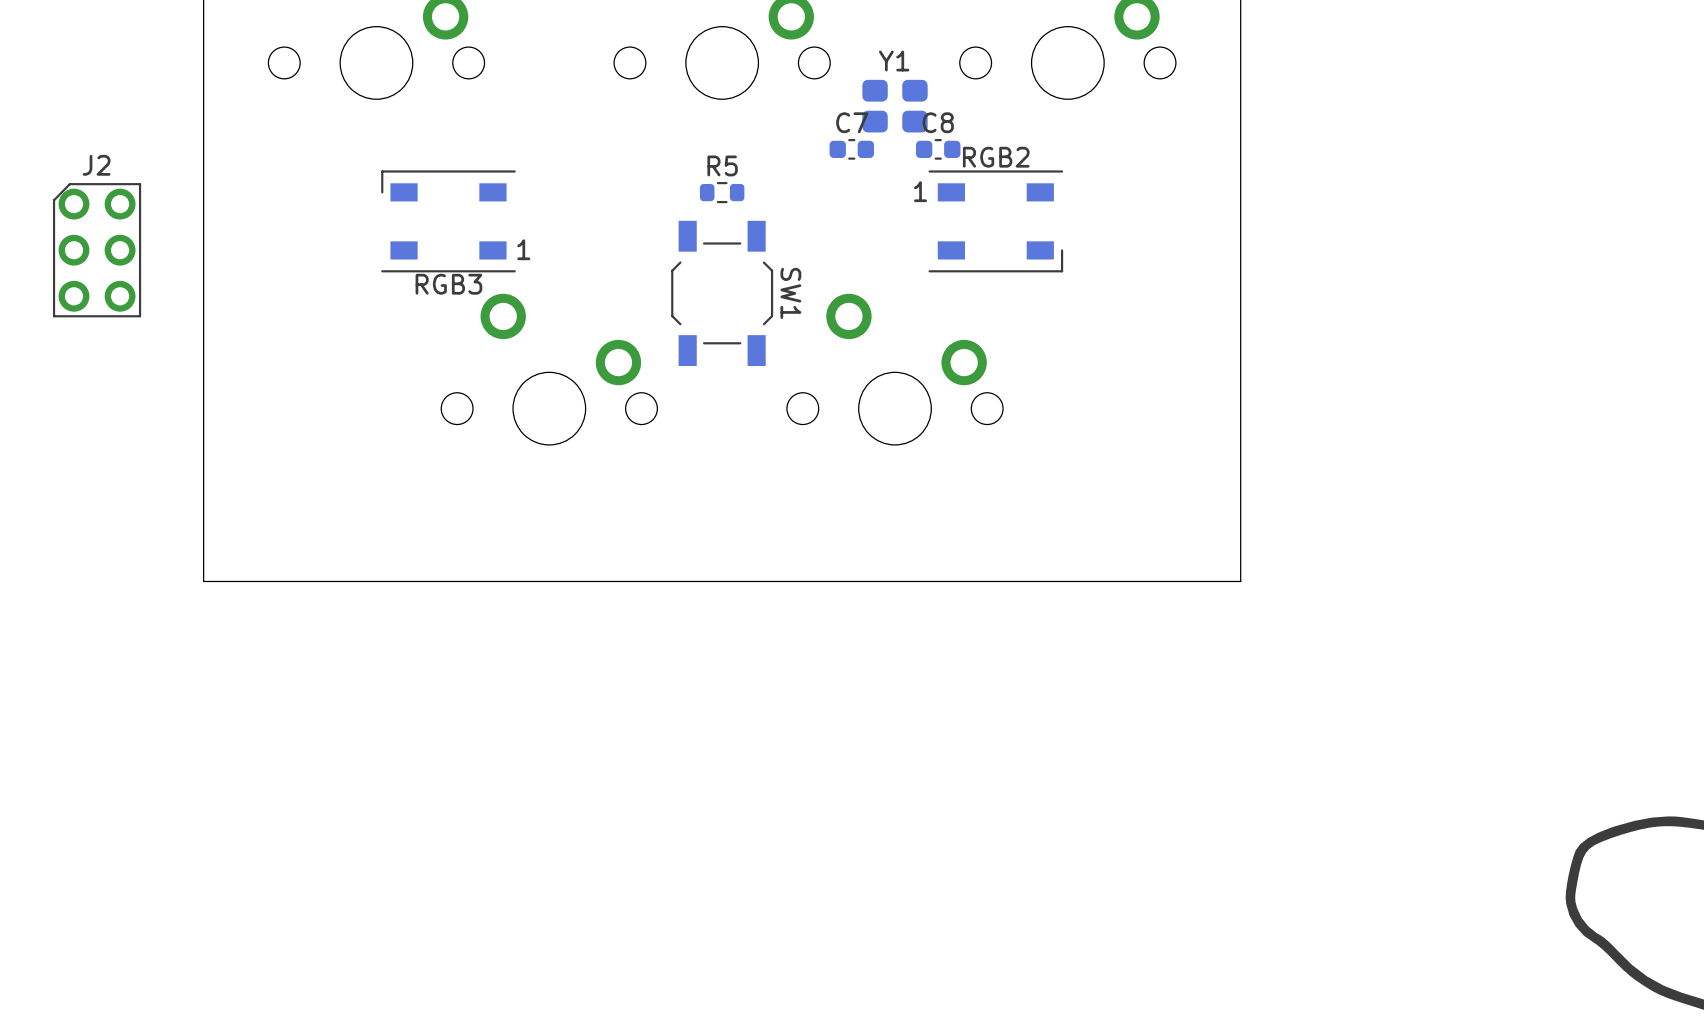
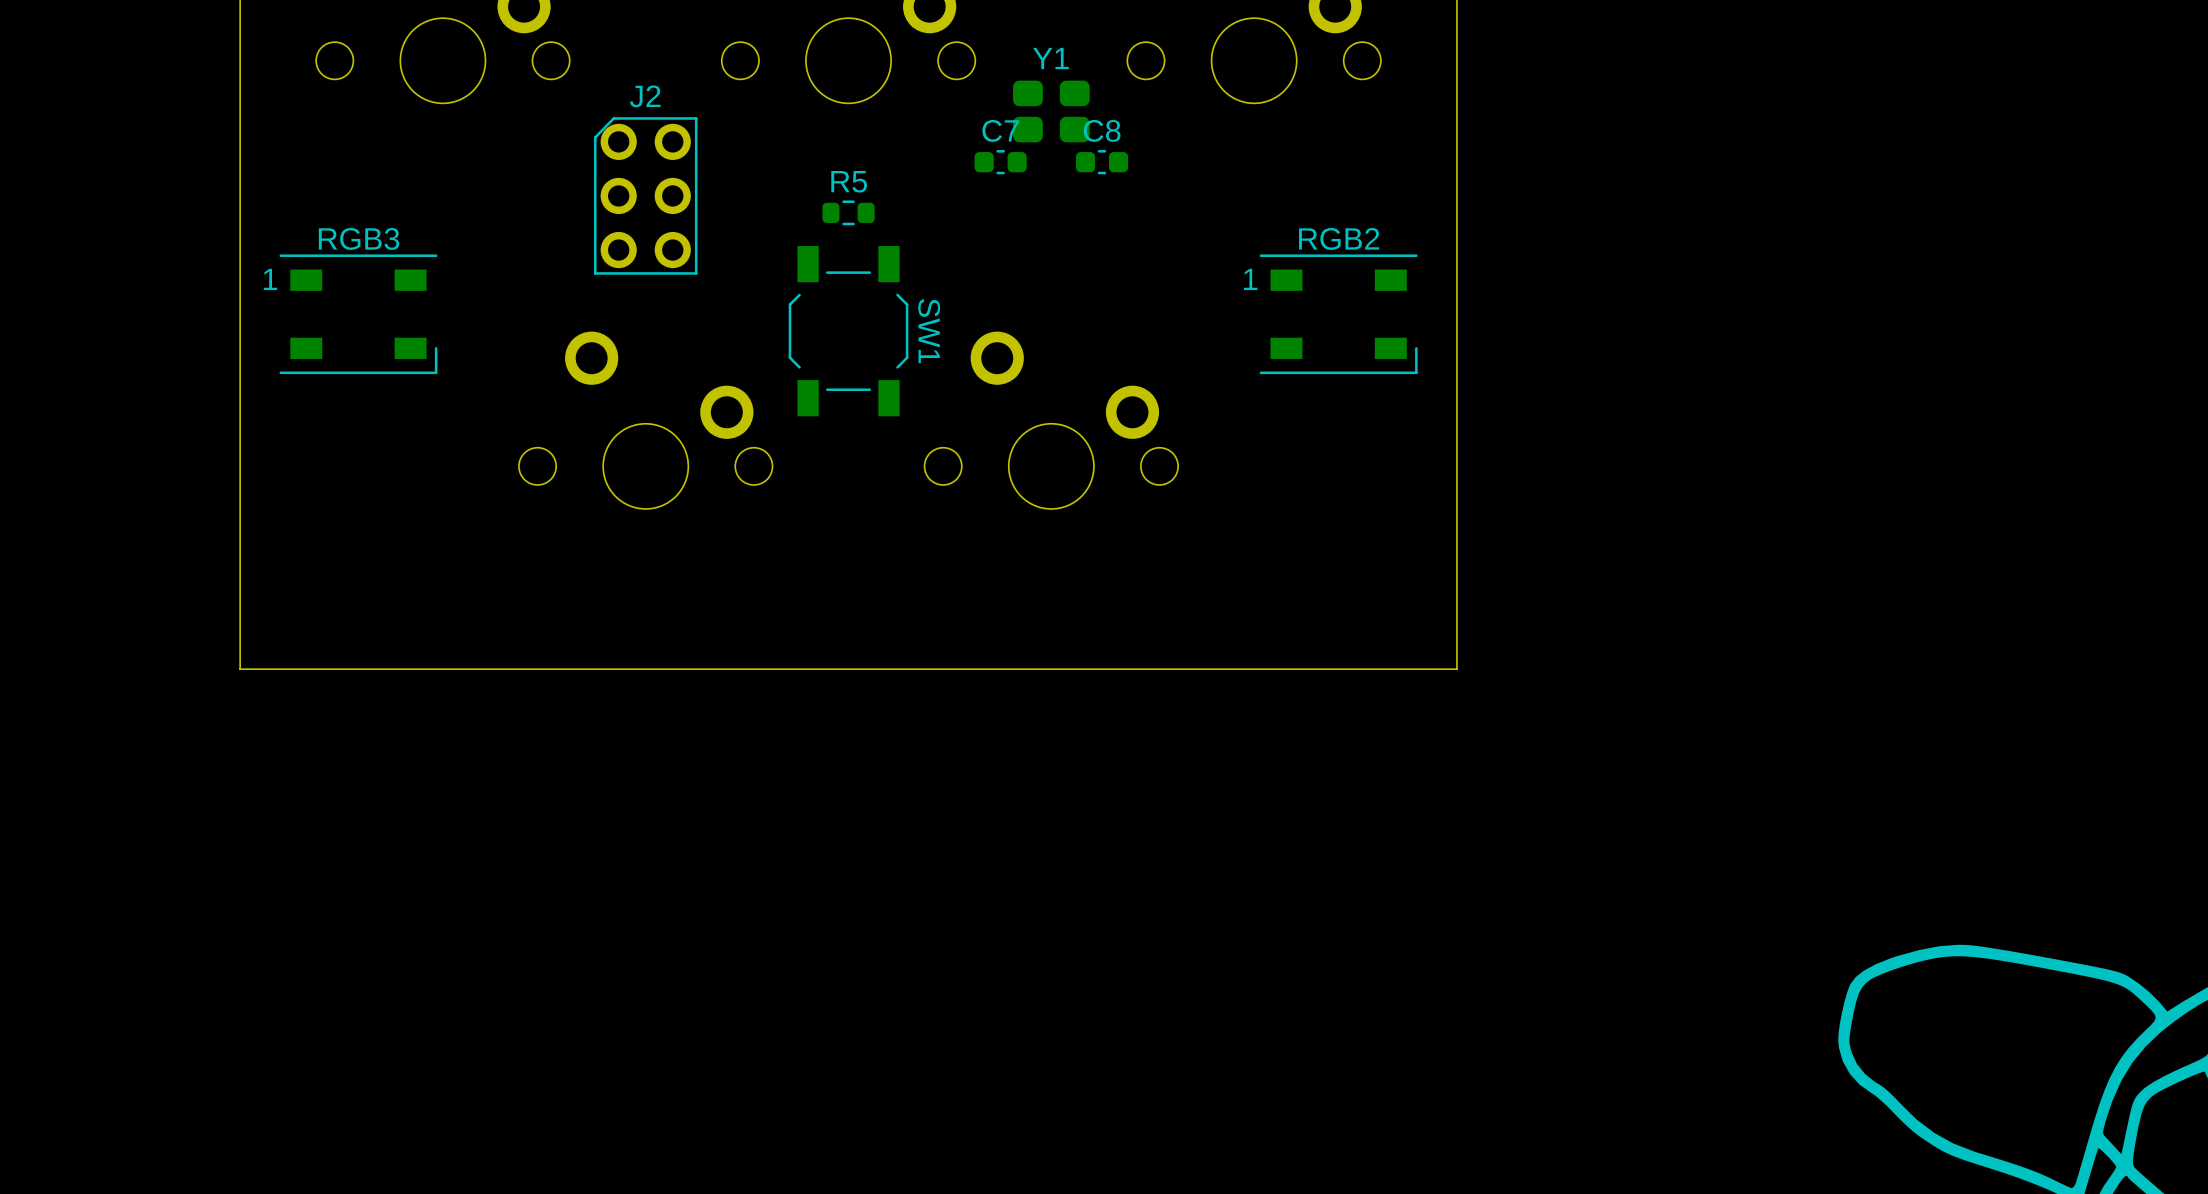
RGB3 rotation: 0° (448, 221) -> 180° (358, 314)
RGB3 position: (448, 221) -> (358, 314)
RGB2 position: (995, 221) -> (1338, 314)
J2 position: (97, 250) -> (645, 195)

